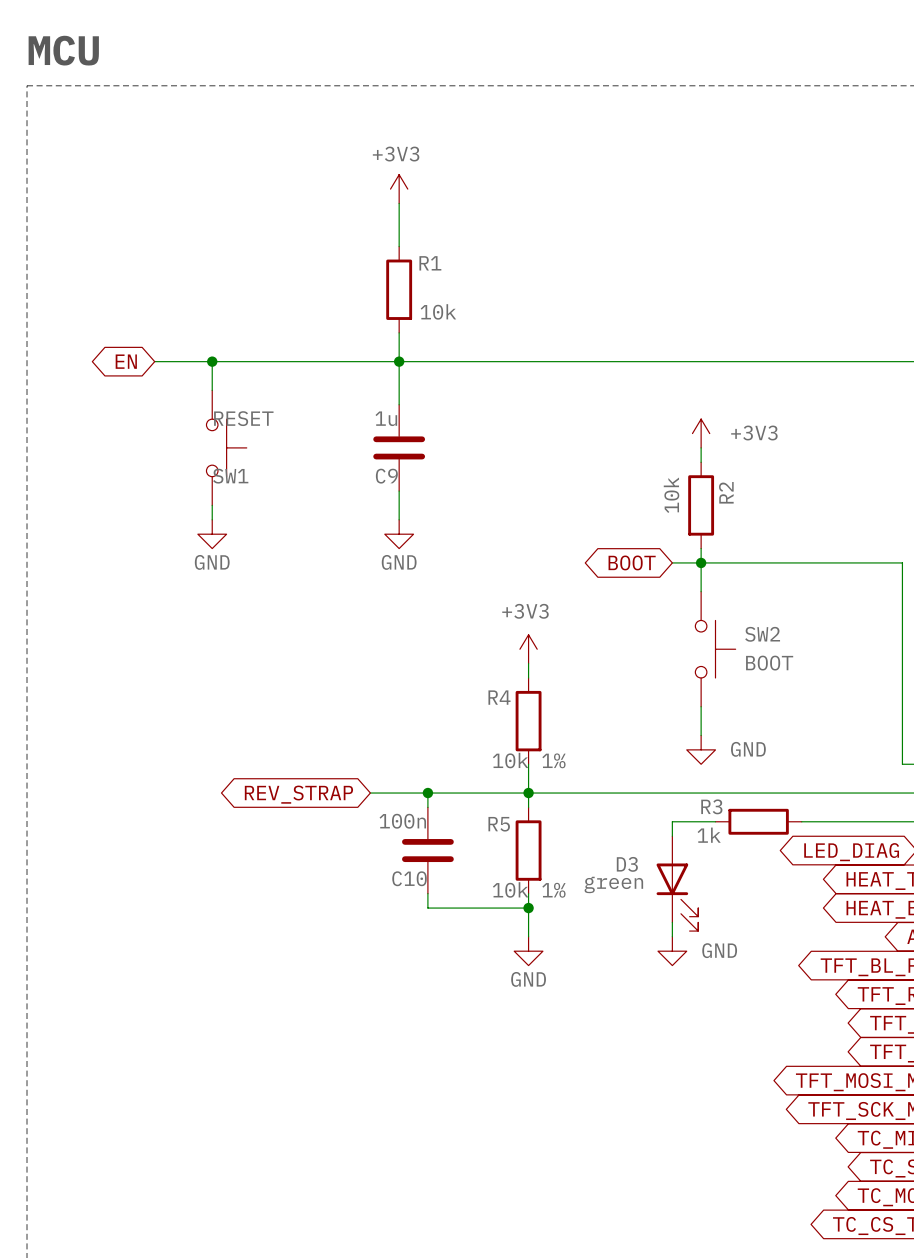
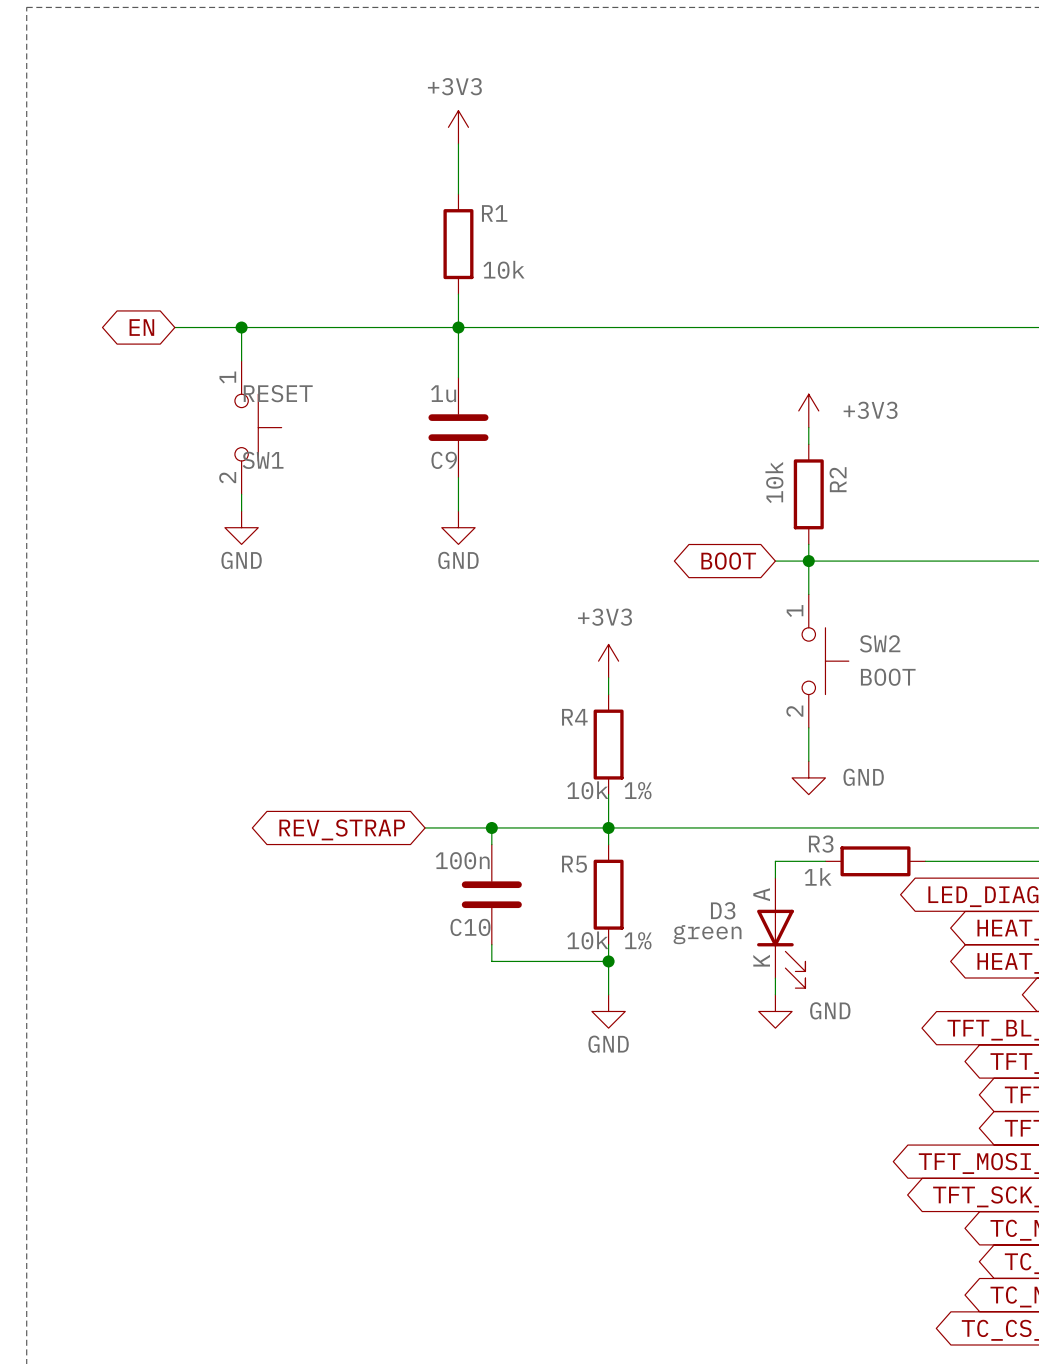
SW1 pin name: none -> 1 (227, 377)
SW1 pin name: none -> 2 (227, 477)
SW2 pin name: none -> 1 (795, 611)
SW2 pin name: none -> 2 (794, 711)
D3 pin name: none -> A (761, 894)
D3 pin name: none -> K (761, 960)

